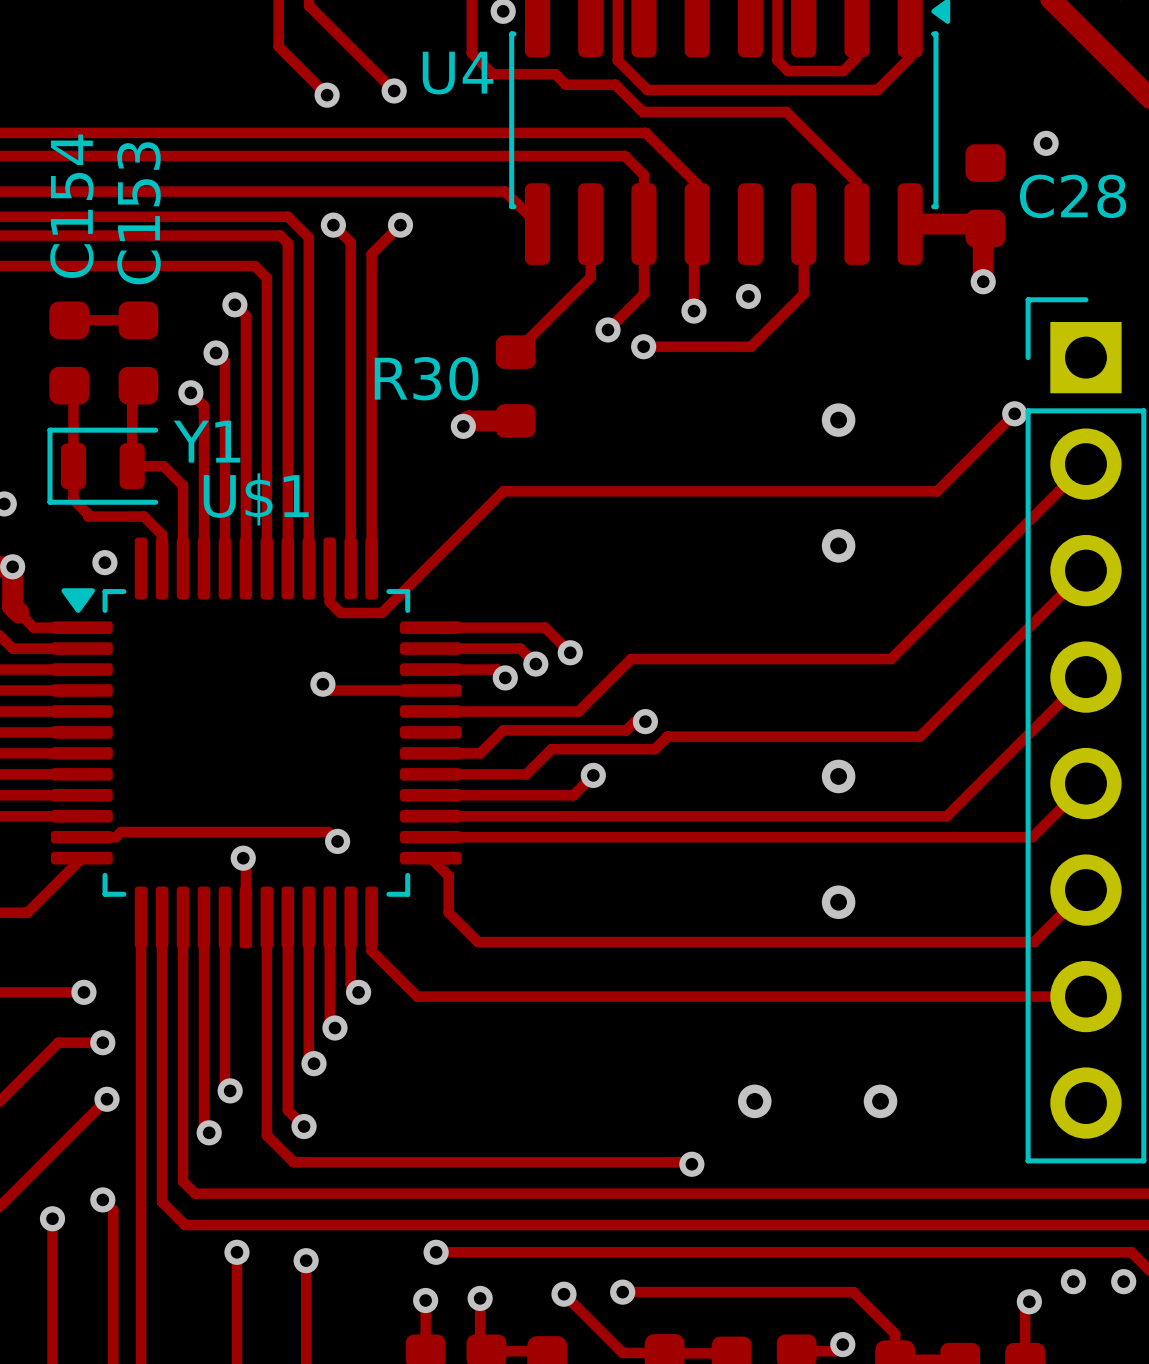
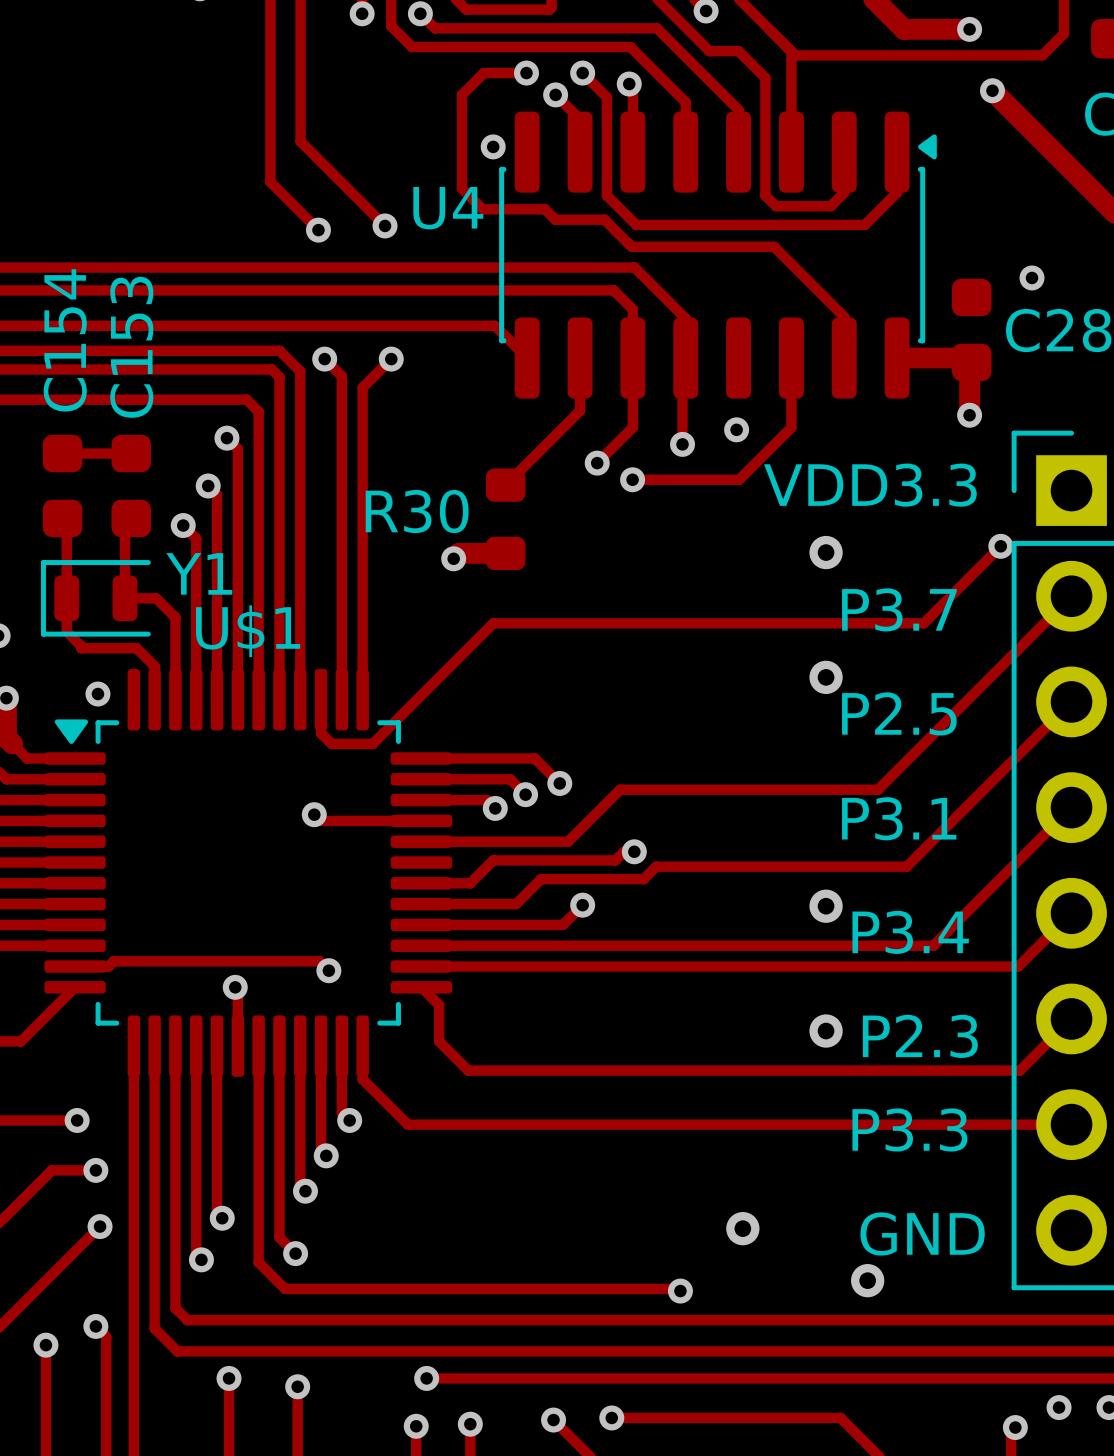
text: none -> VDD3.3 (870, 485)
text: none -> P3.7 (899, 609)
text: none -> P2.5 (899, 713)
text: none -> P3.1 (899, 818)
text: none -> P3.4 (910, 932)
text: none -> P2.3 (920, 1036)
text: none -> P3.3 (909, 1129)
via position: (880, 1101) -> (867, 1280)
text: none -> GND (922, 1233)

